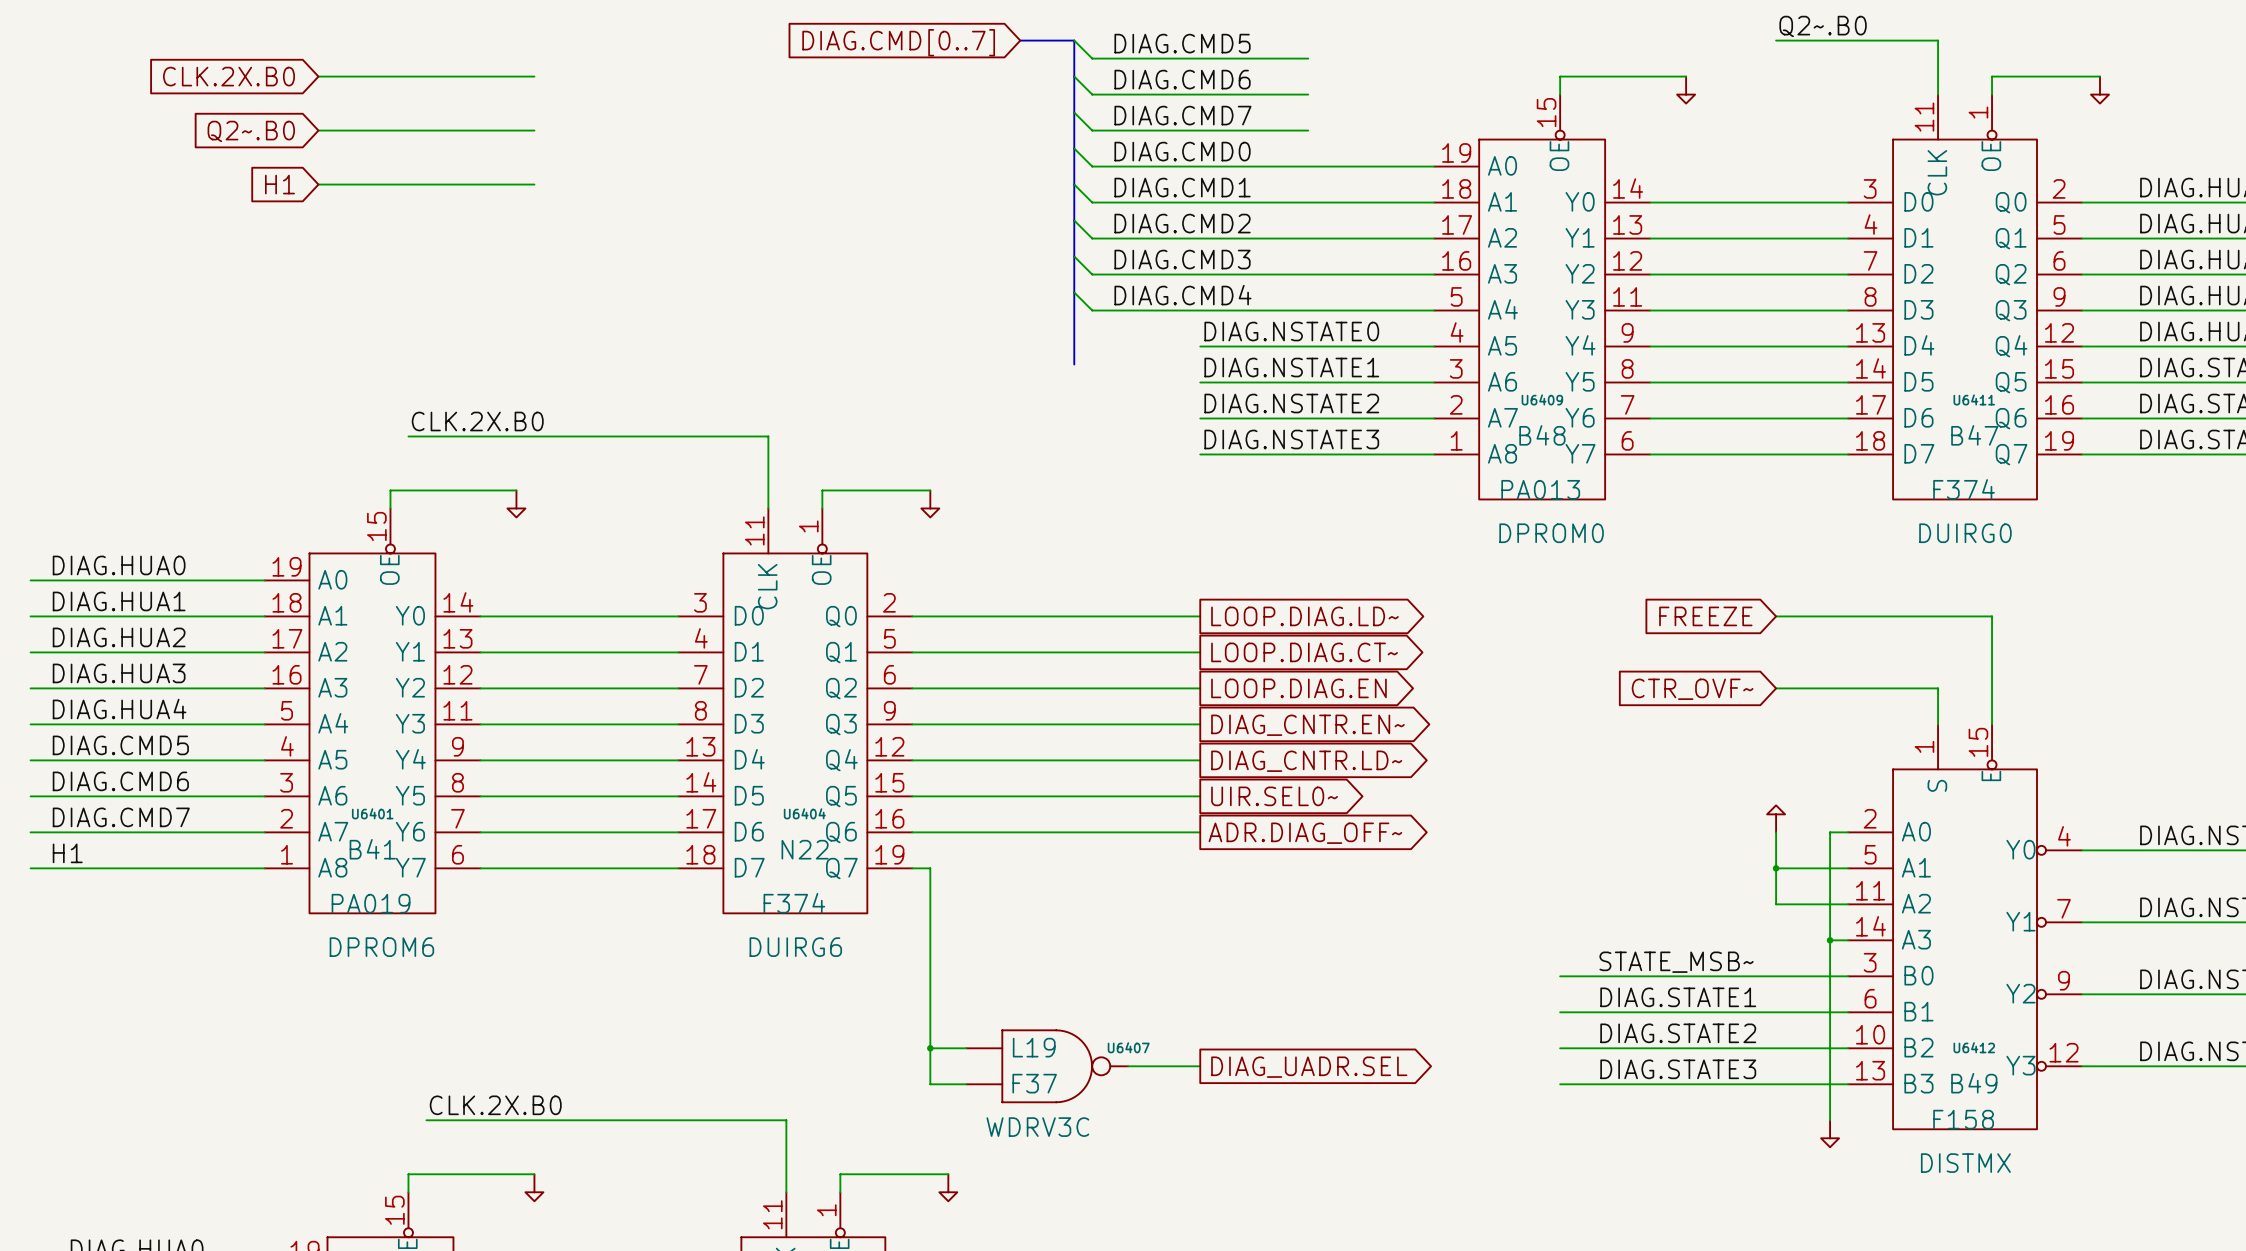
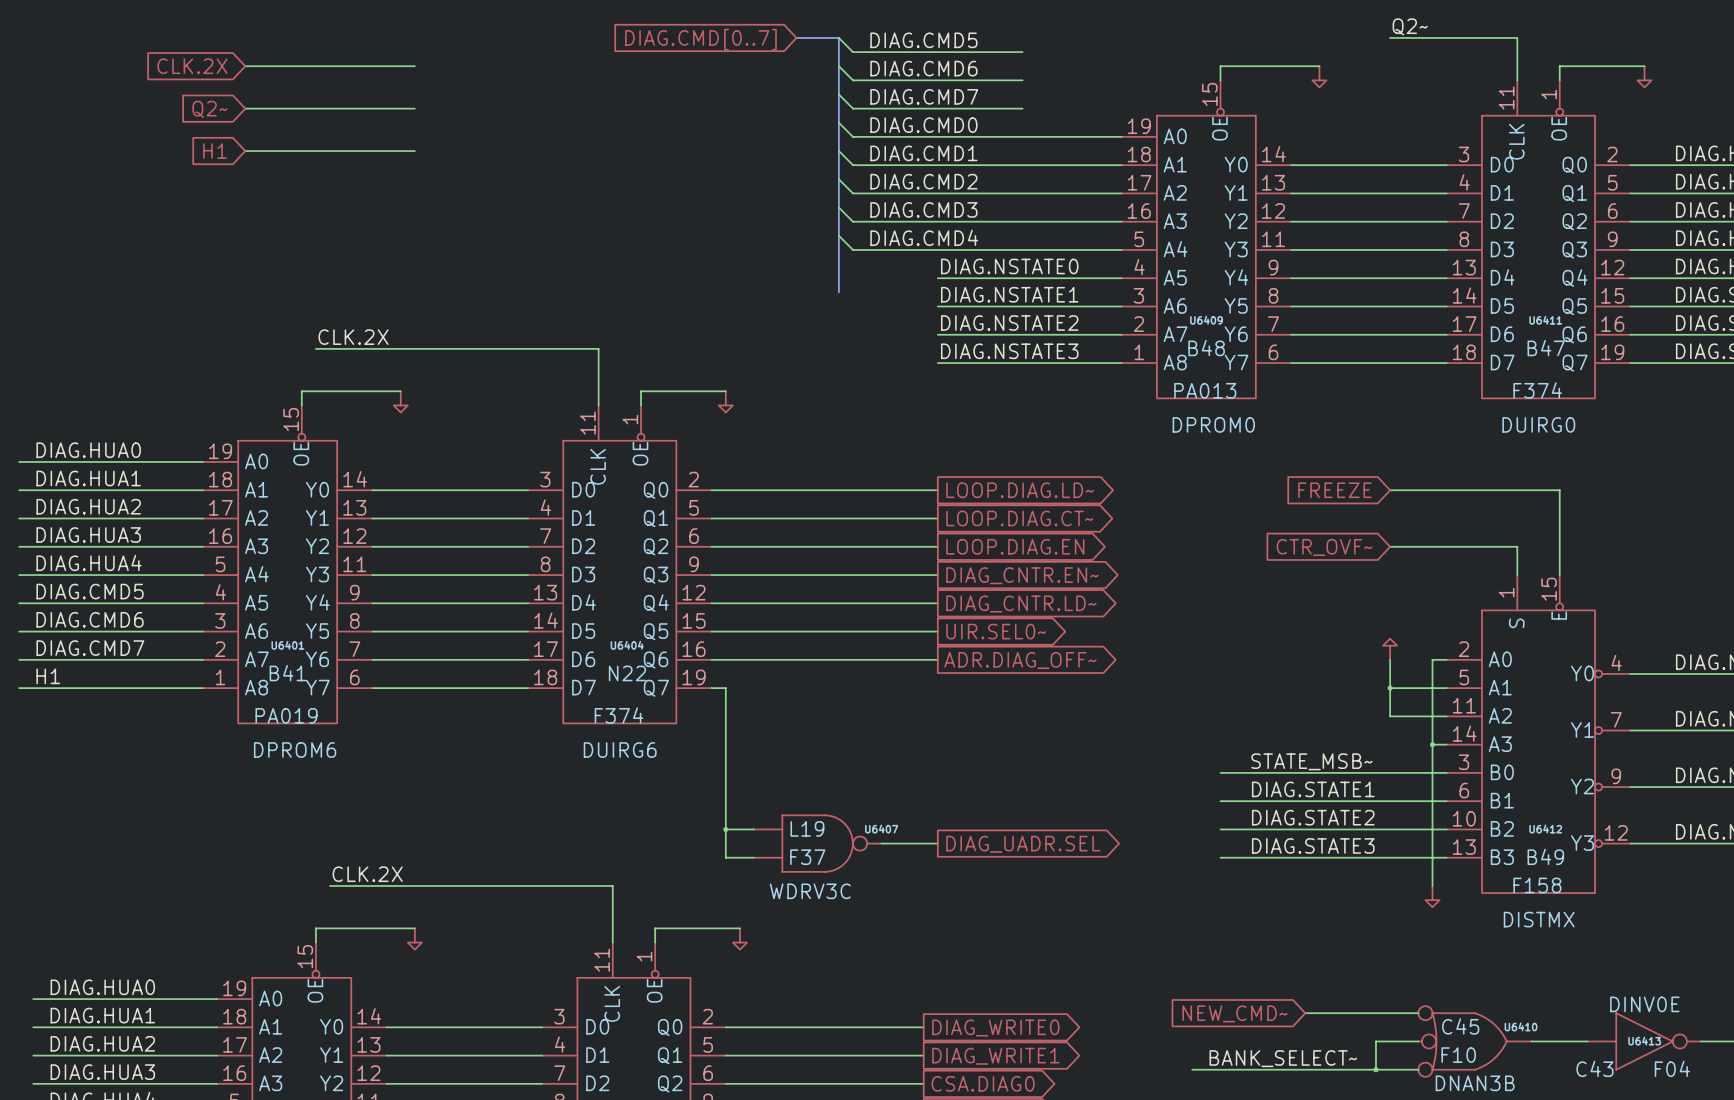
label: Q2~.B0 (1823, 26) -> Q2~ (1410, 26)
global label: CLK.2X.B0 (228, 76) -> CLK.2X (192, 66)
global label: Q2~.B0 (251, 131) -> Q2~ (209, 109)
label: CLK.2X.B0 (477, 421) -> CLK.2X (353, 337)
label: CLK.2X.B0 (495, 1105) -> CLK.2X (367, 874)

